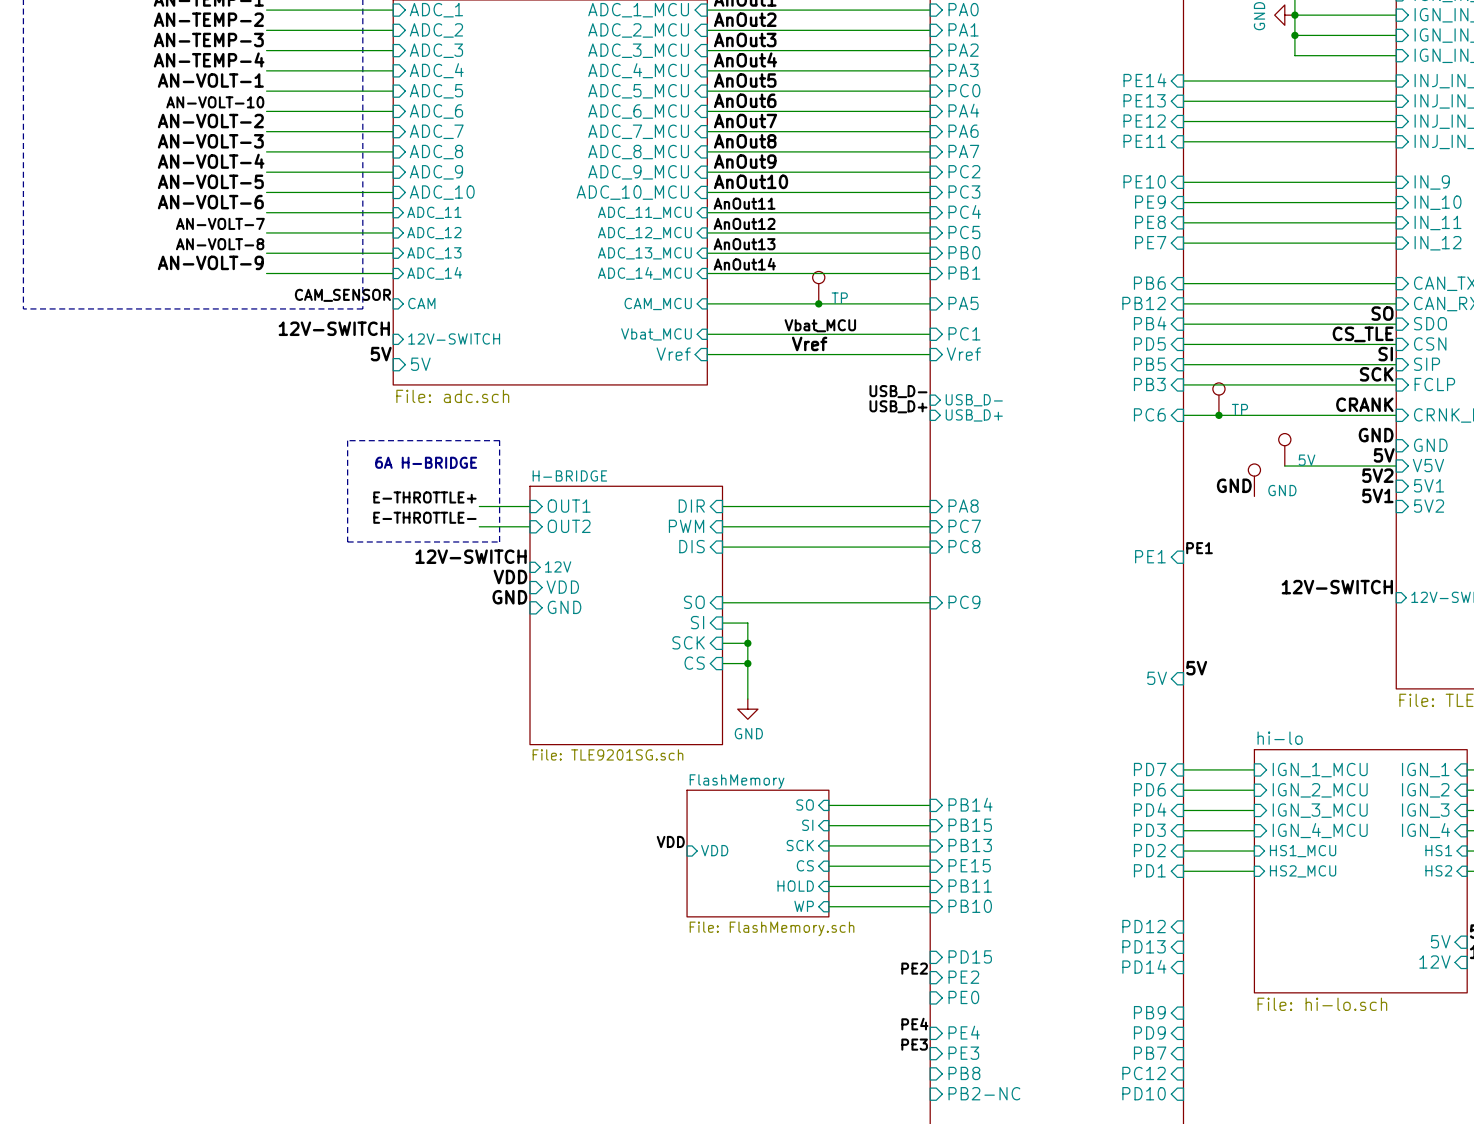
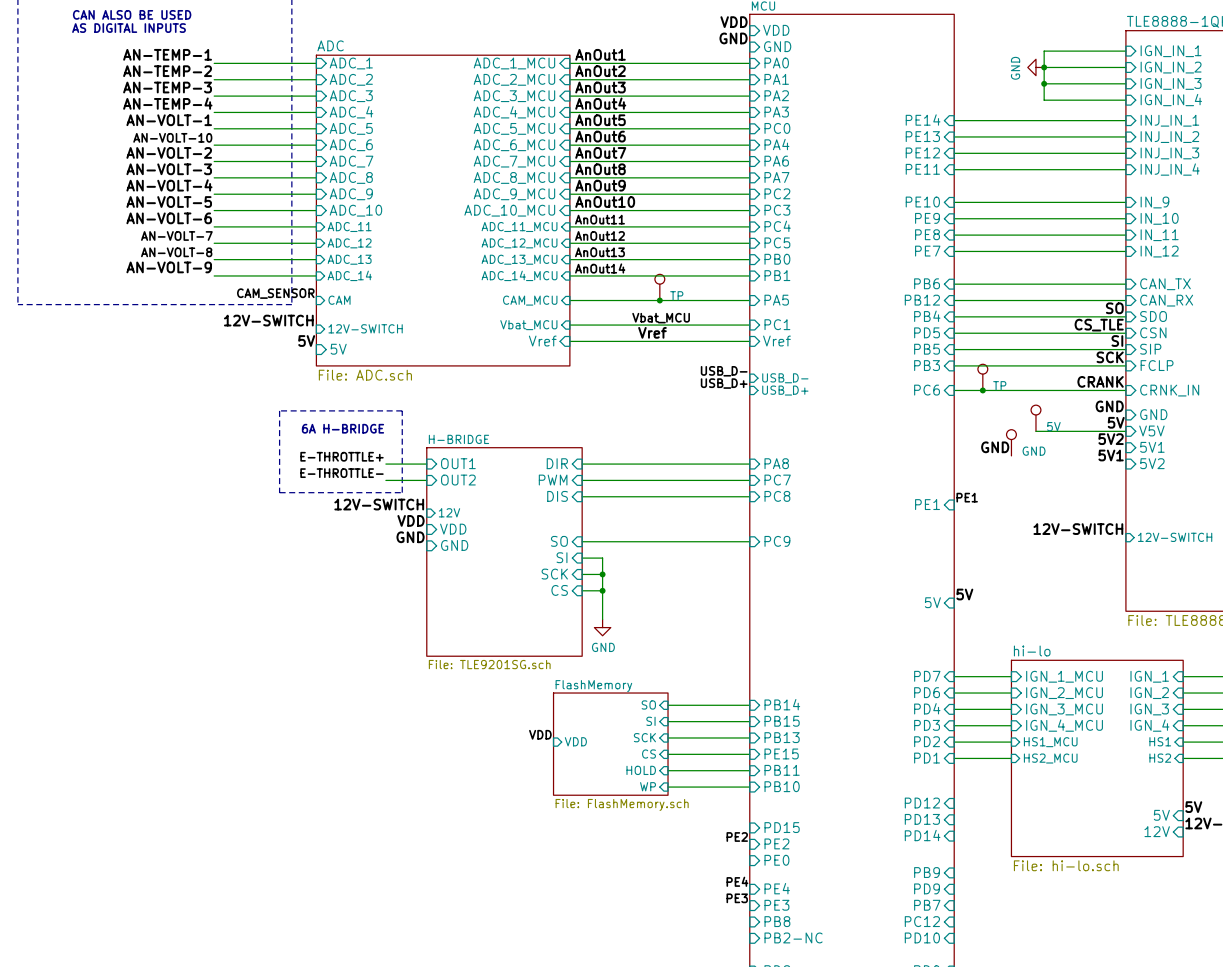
sheet ADC value: File: adc.sch (452, 396) -> File: ADC.sch (365, 375)

